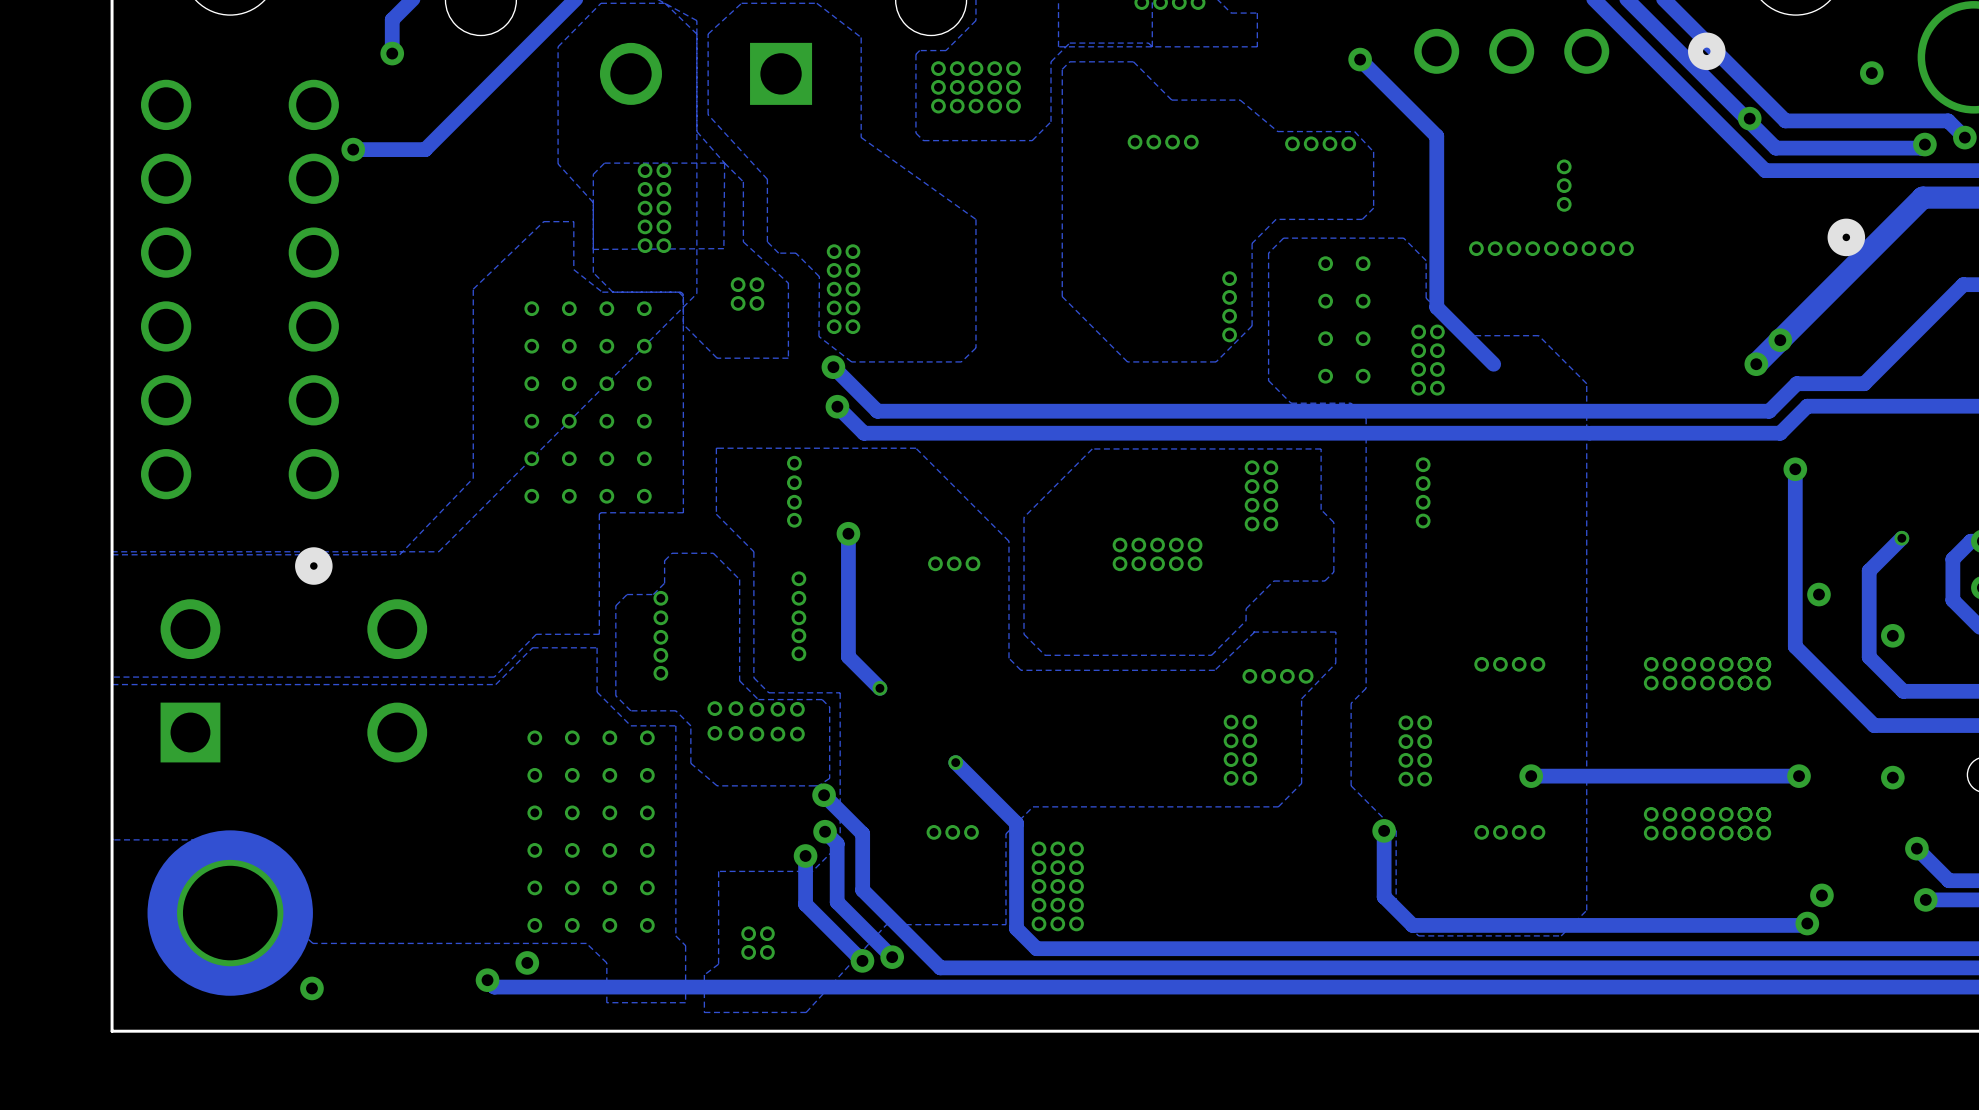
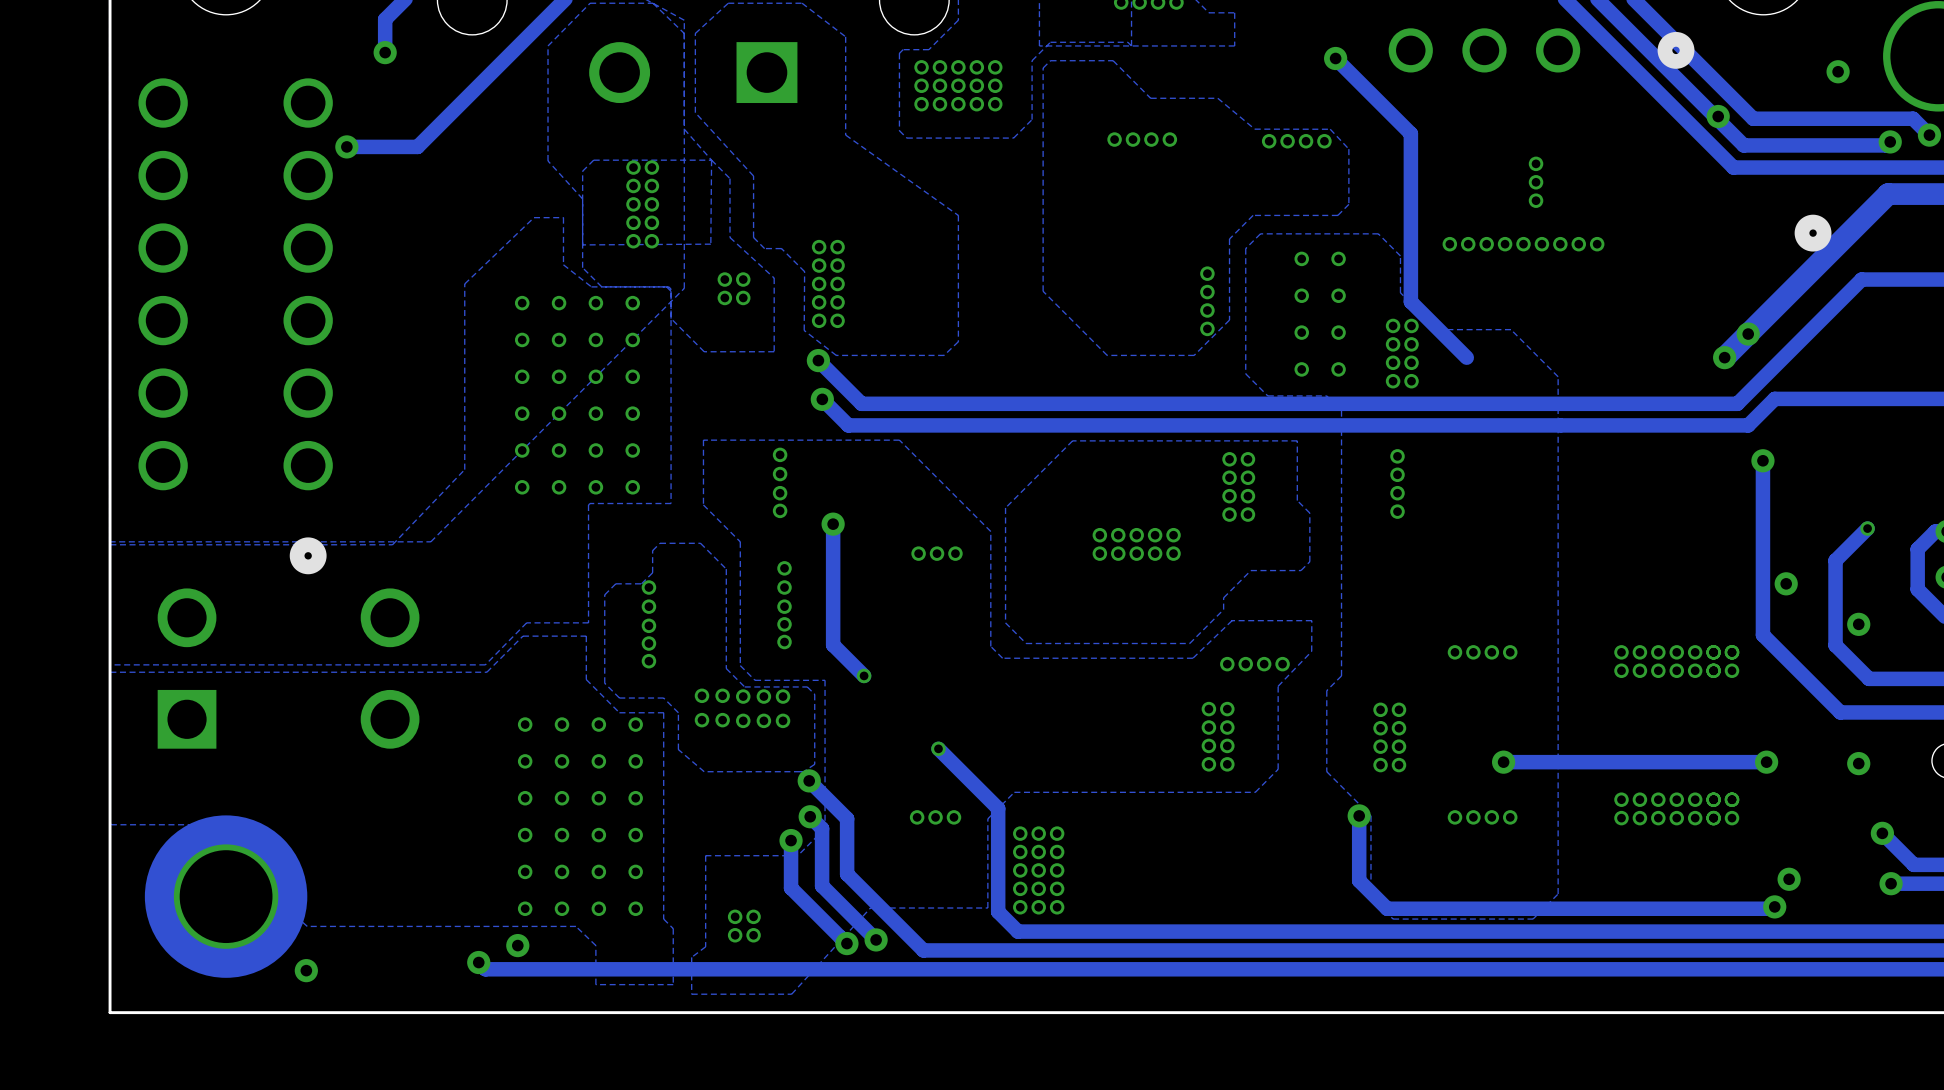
track: (1963, 284) (1864, 383) (1796, 383) -> (1927, 279) (1861, 279) (1764, 376)

